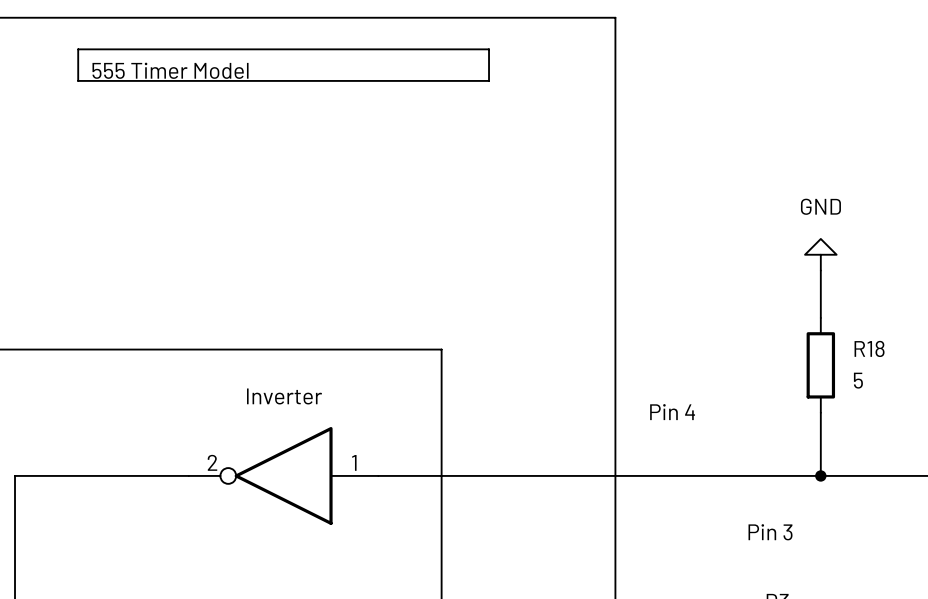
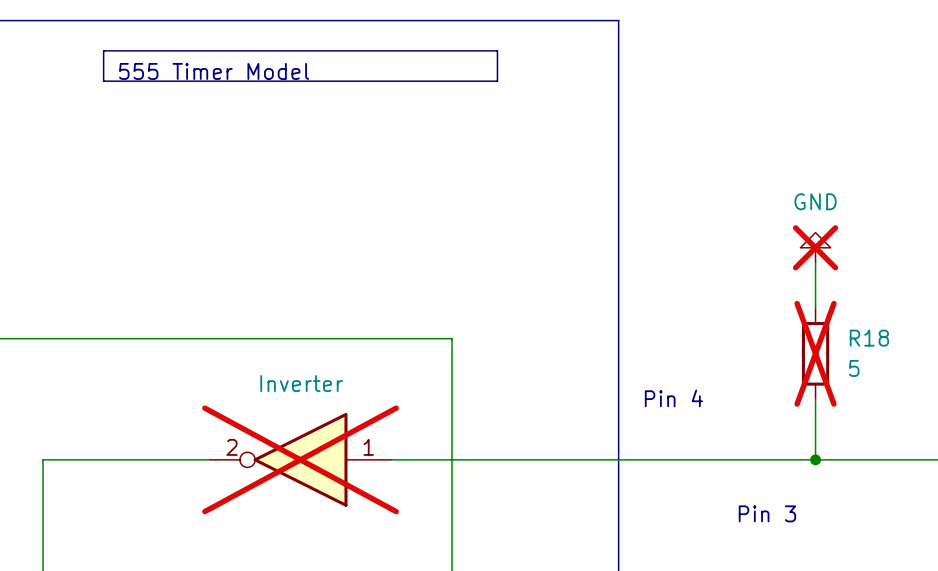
power symbol do-not-place cross: none -> (815, 247)
R18 do-not-place cross: none -> (815, 353)
part do-not-place cross: none -> (300, 459)

